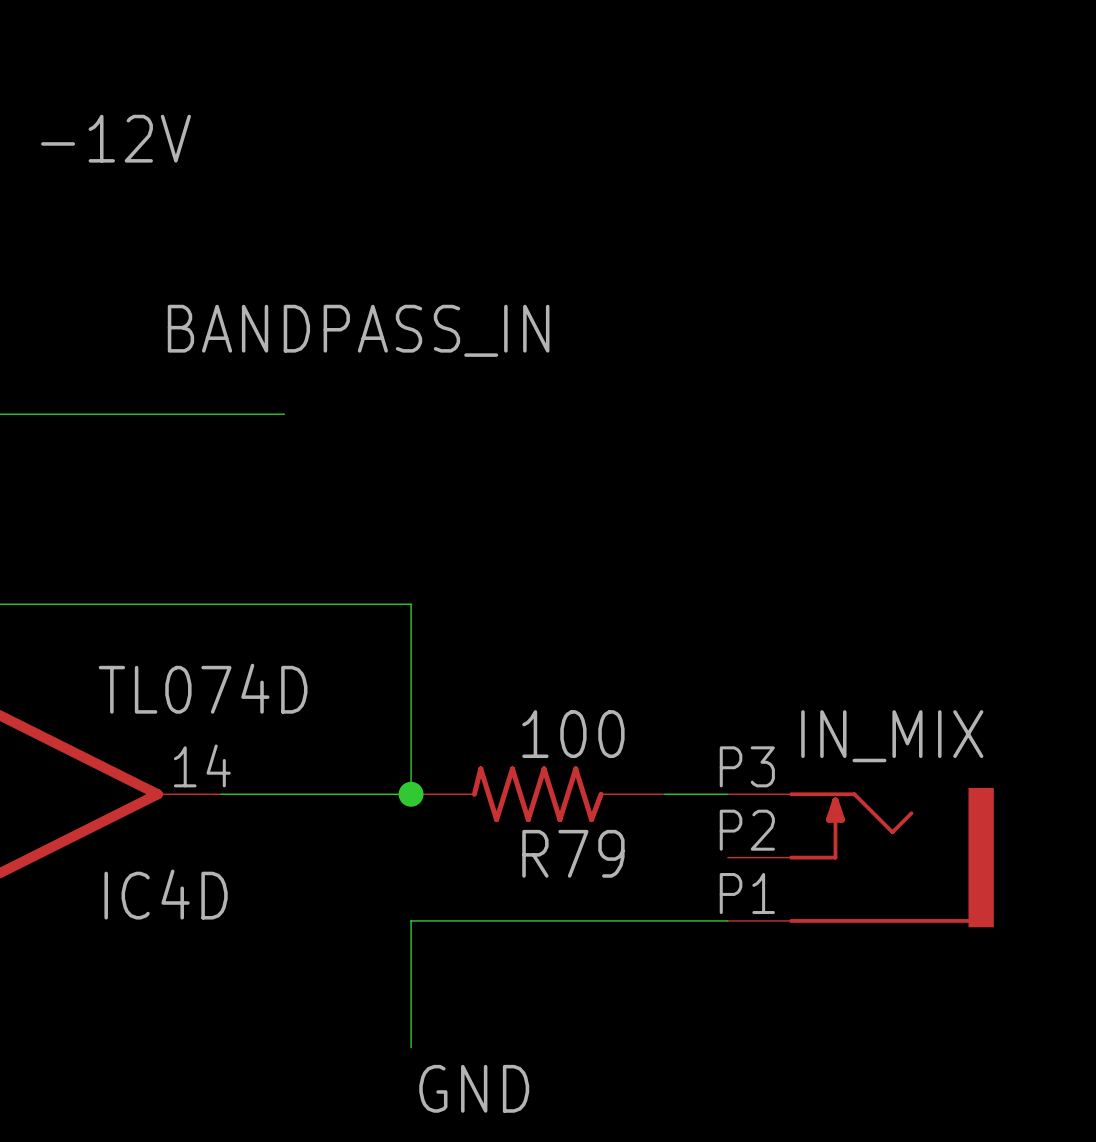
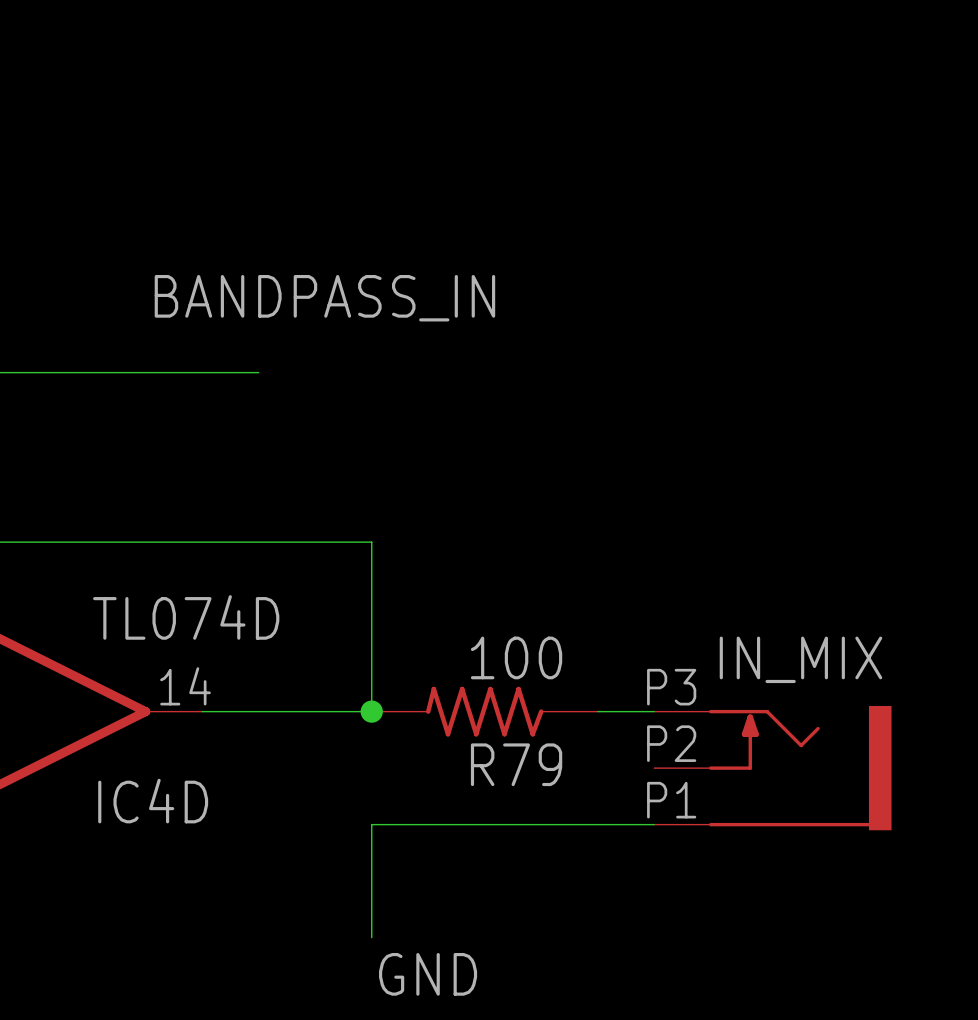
label: -12V (116, 138) -> none

